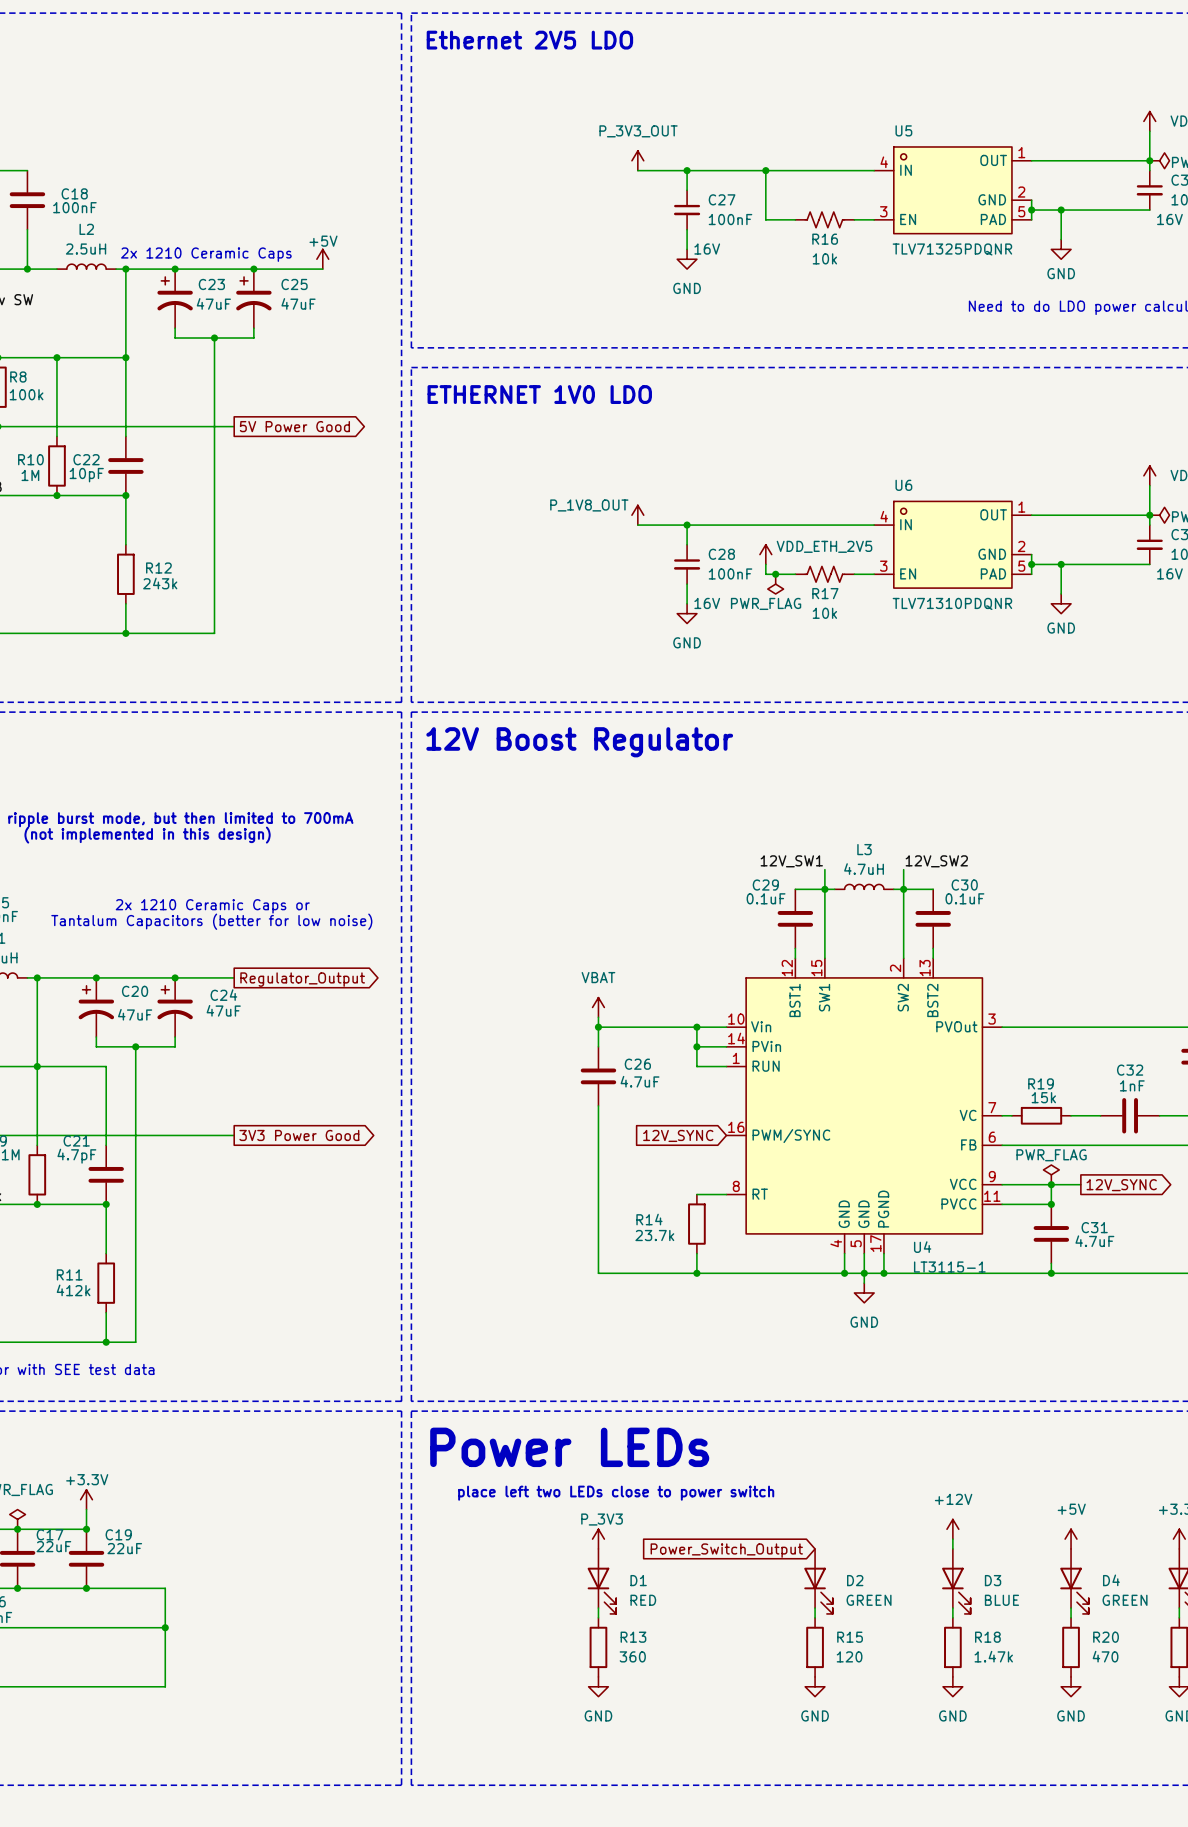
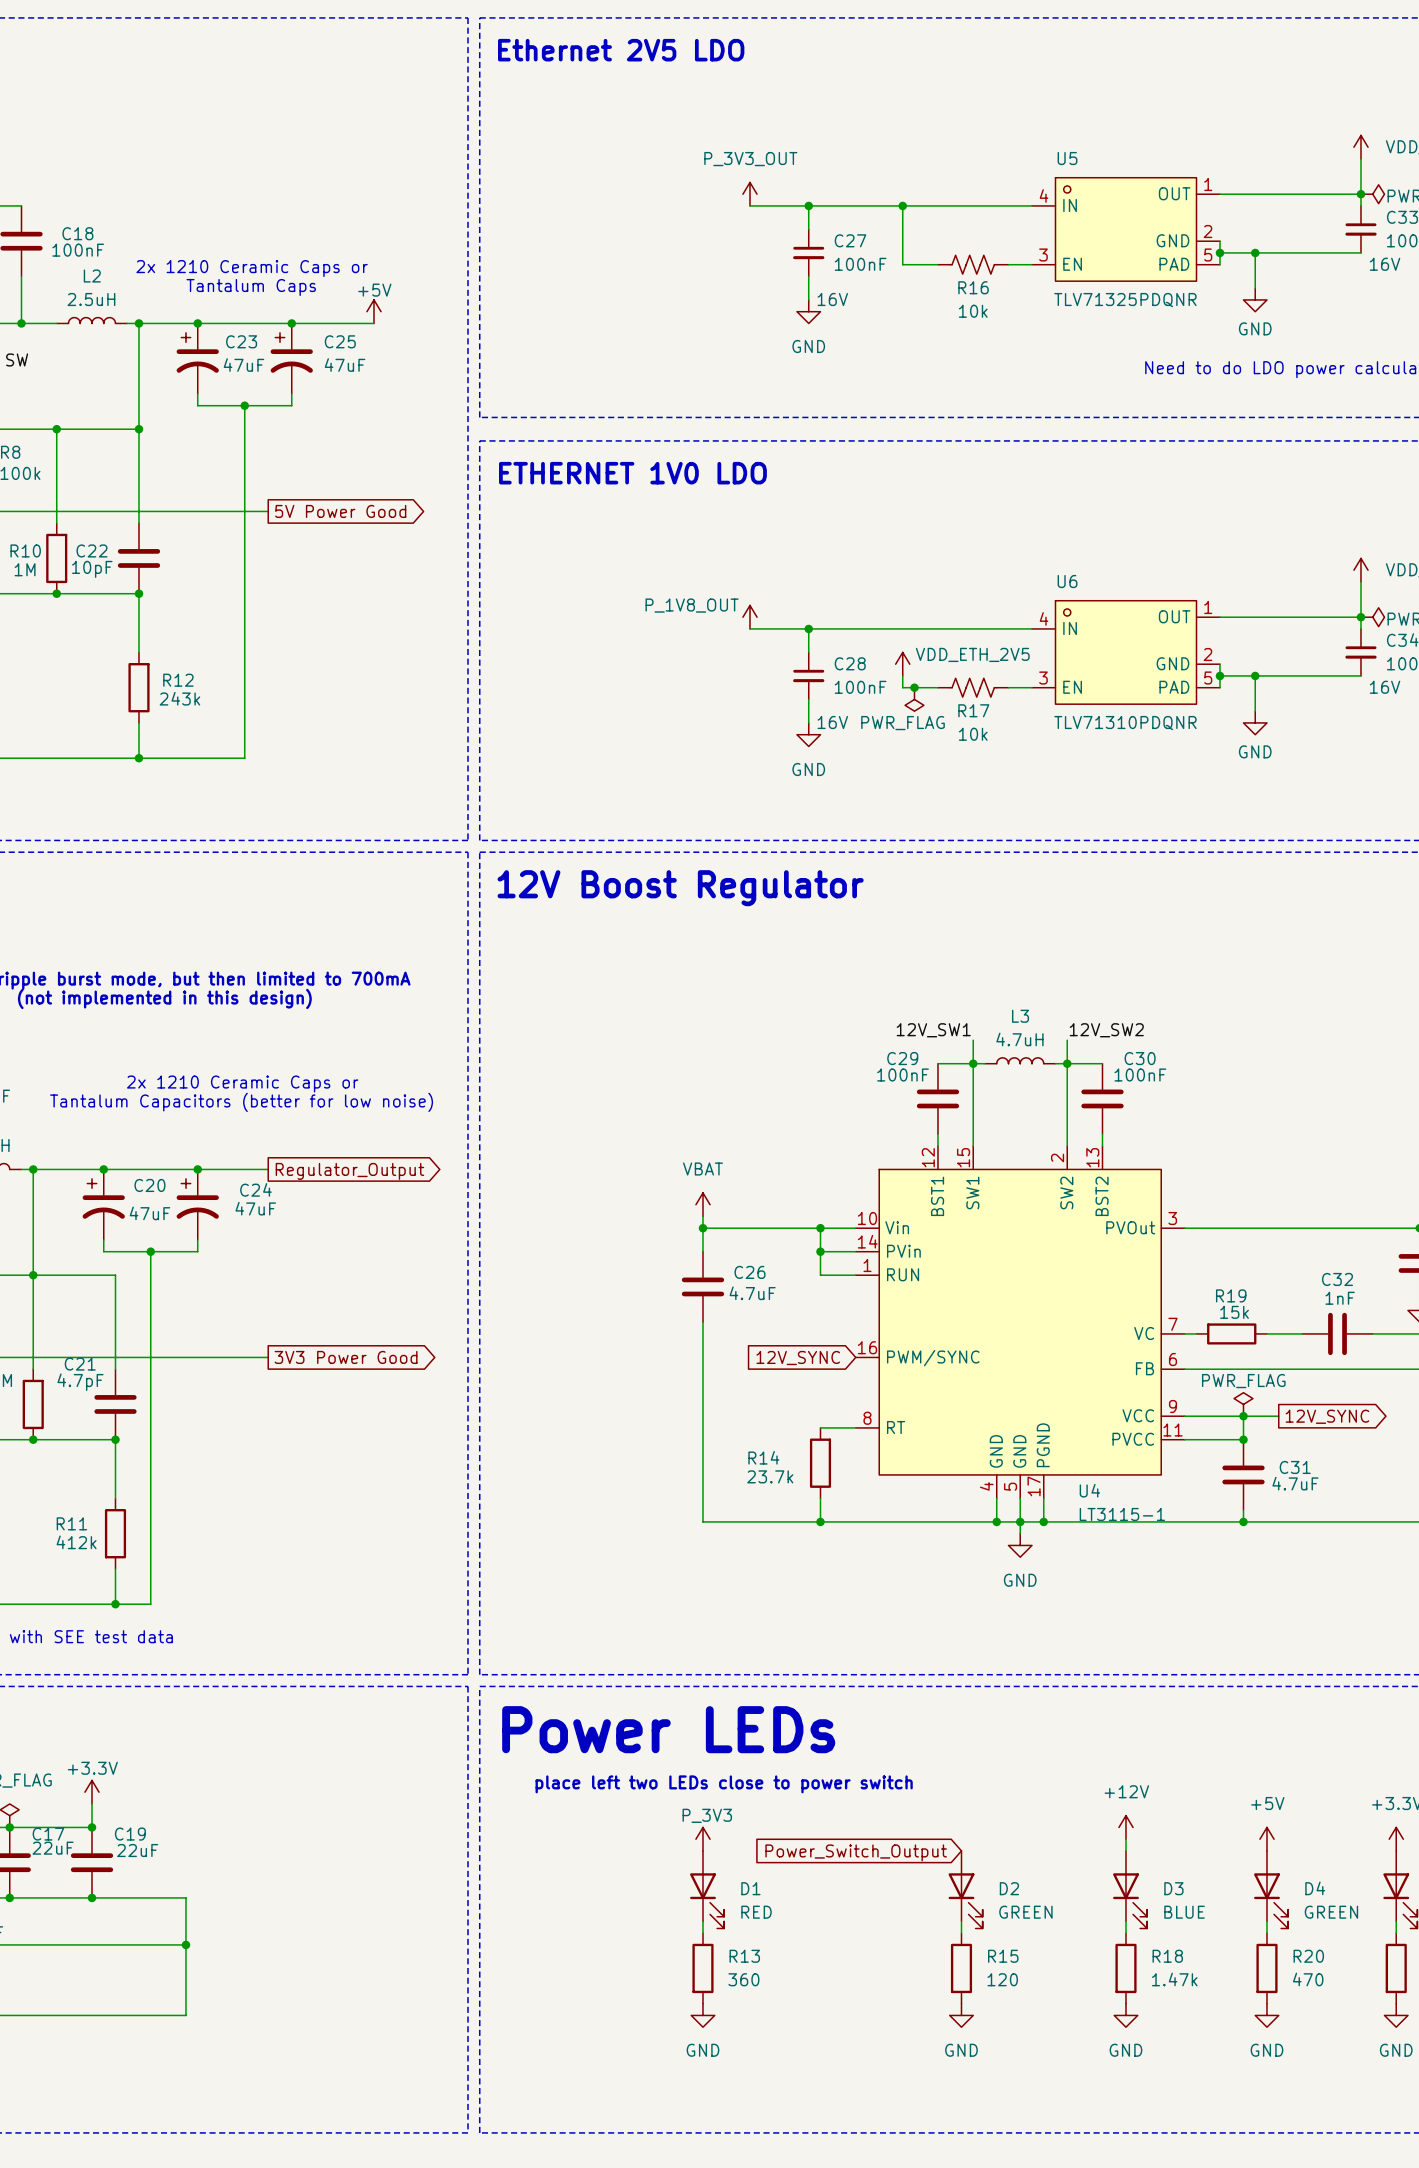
text: none -> 2x 1210 Ceramic Caps or (252, 268)
text: none -> Tantalum Caps (251, 287)
text: 2x 1210 Ceramic Caps (206, 254) -> none
C29 value: 0.1uF (766, 898) -> 100nF (903, 1075)
C30 value: 0.1uF (964, 898) -> 100nF (1140, 1075)

